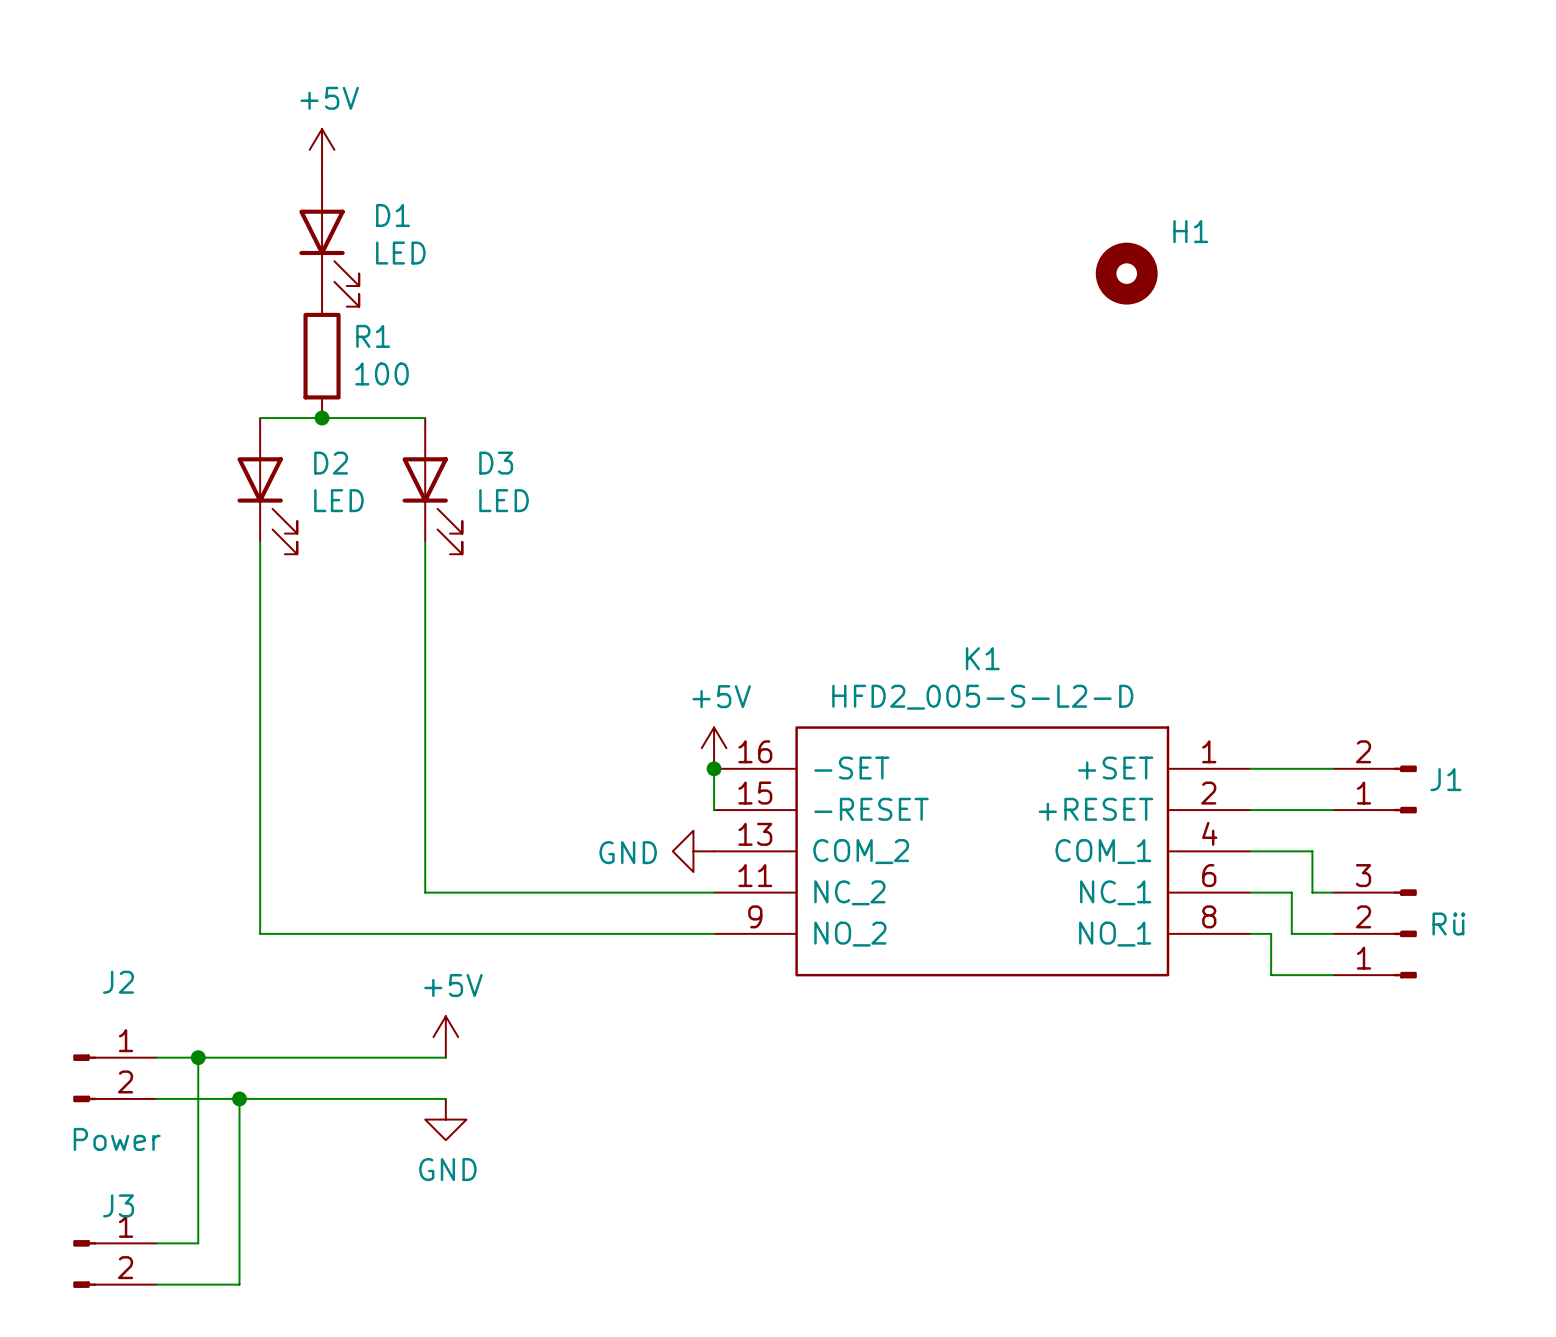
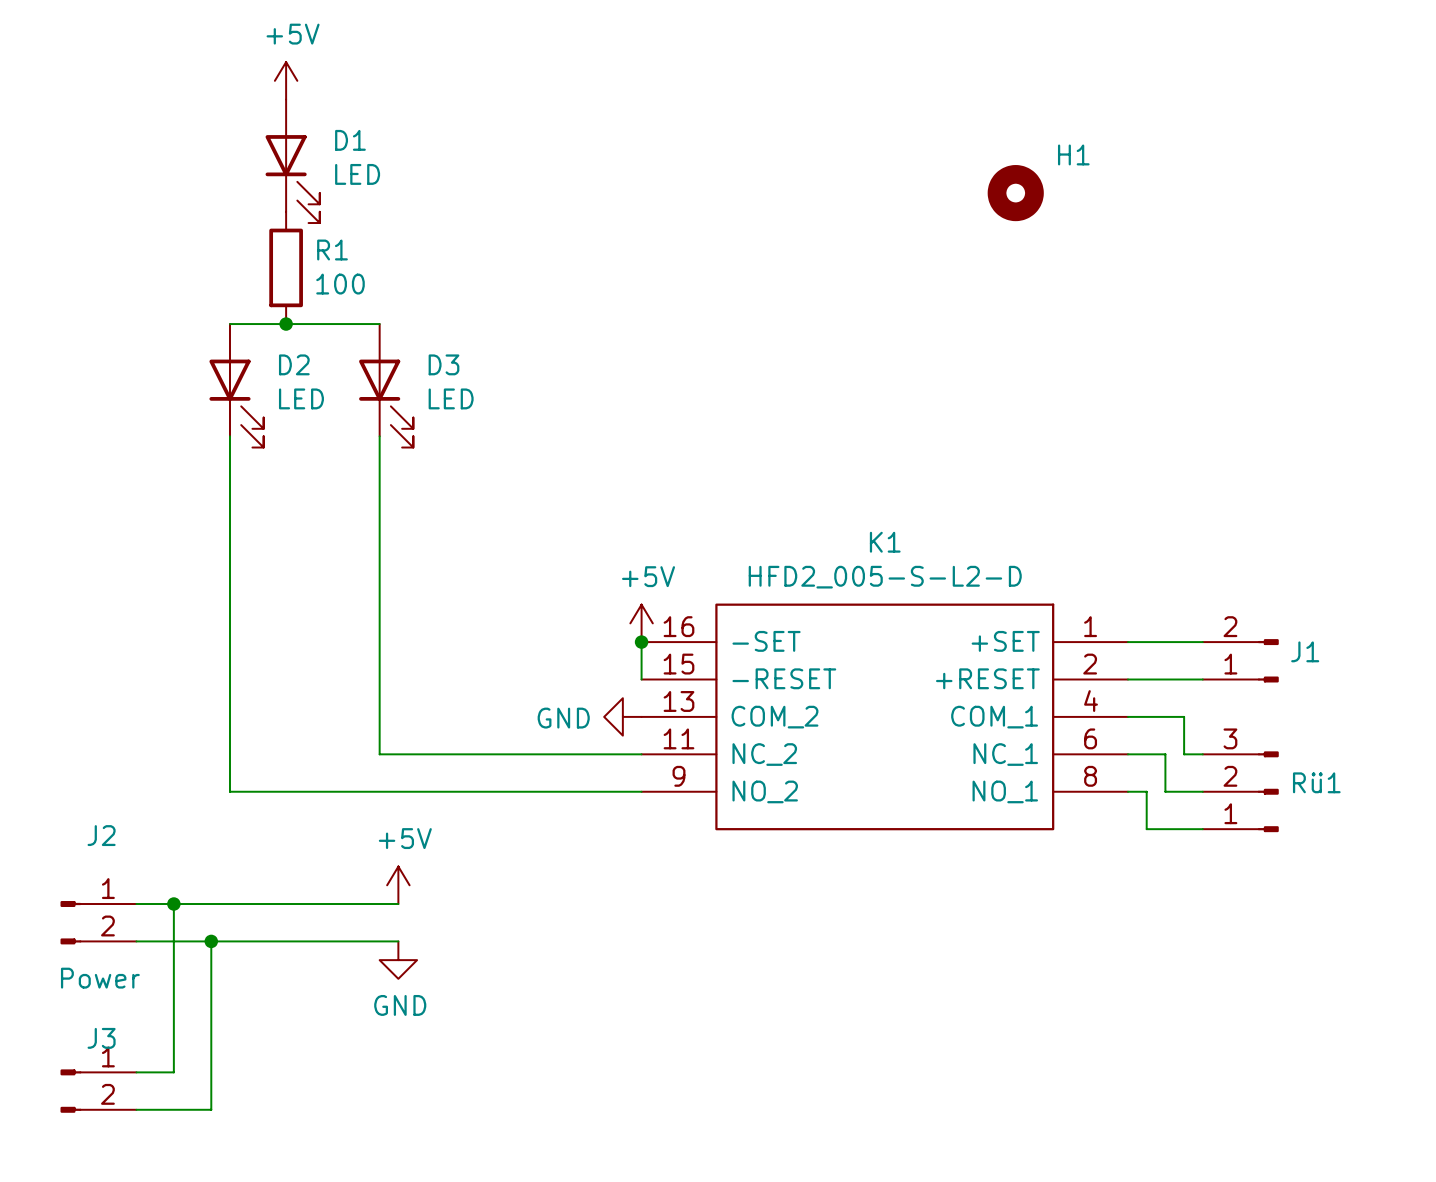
Rü name: Rü (1448, 924) -> Rü1 (1316, 782)

